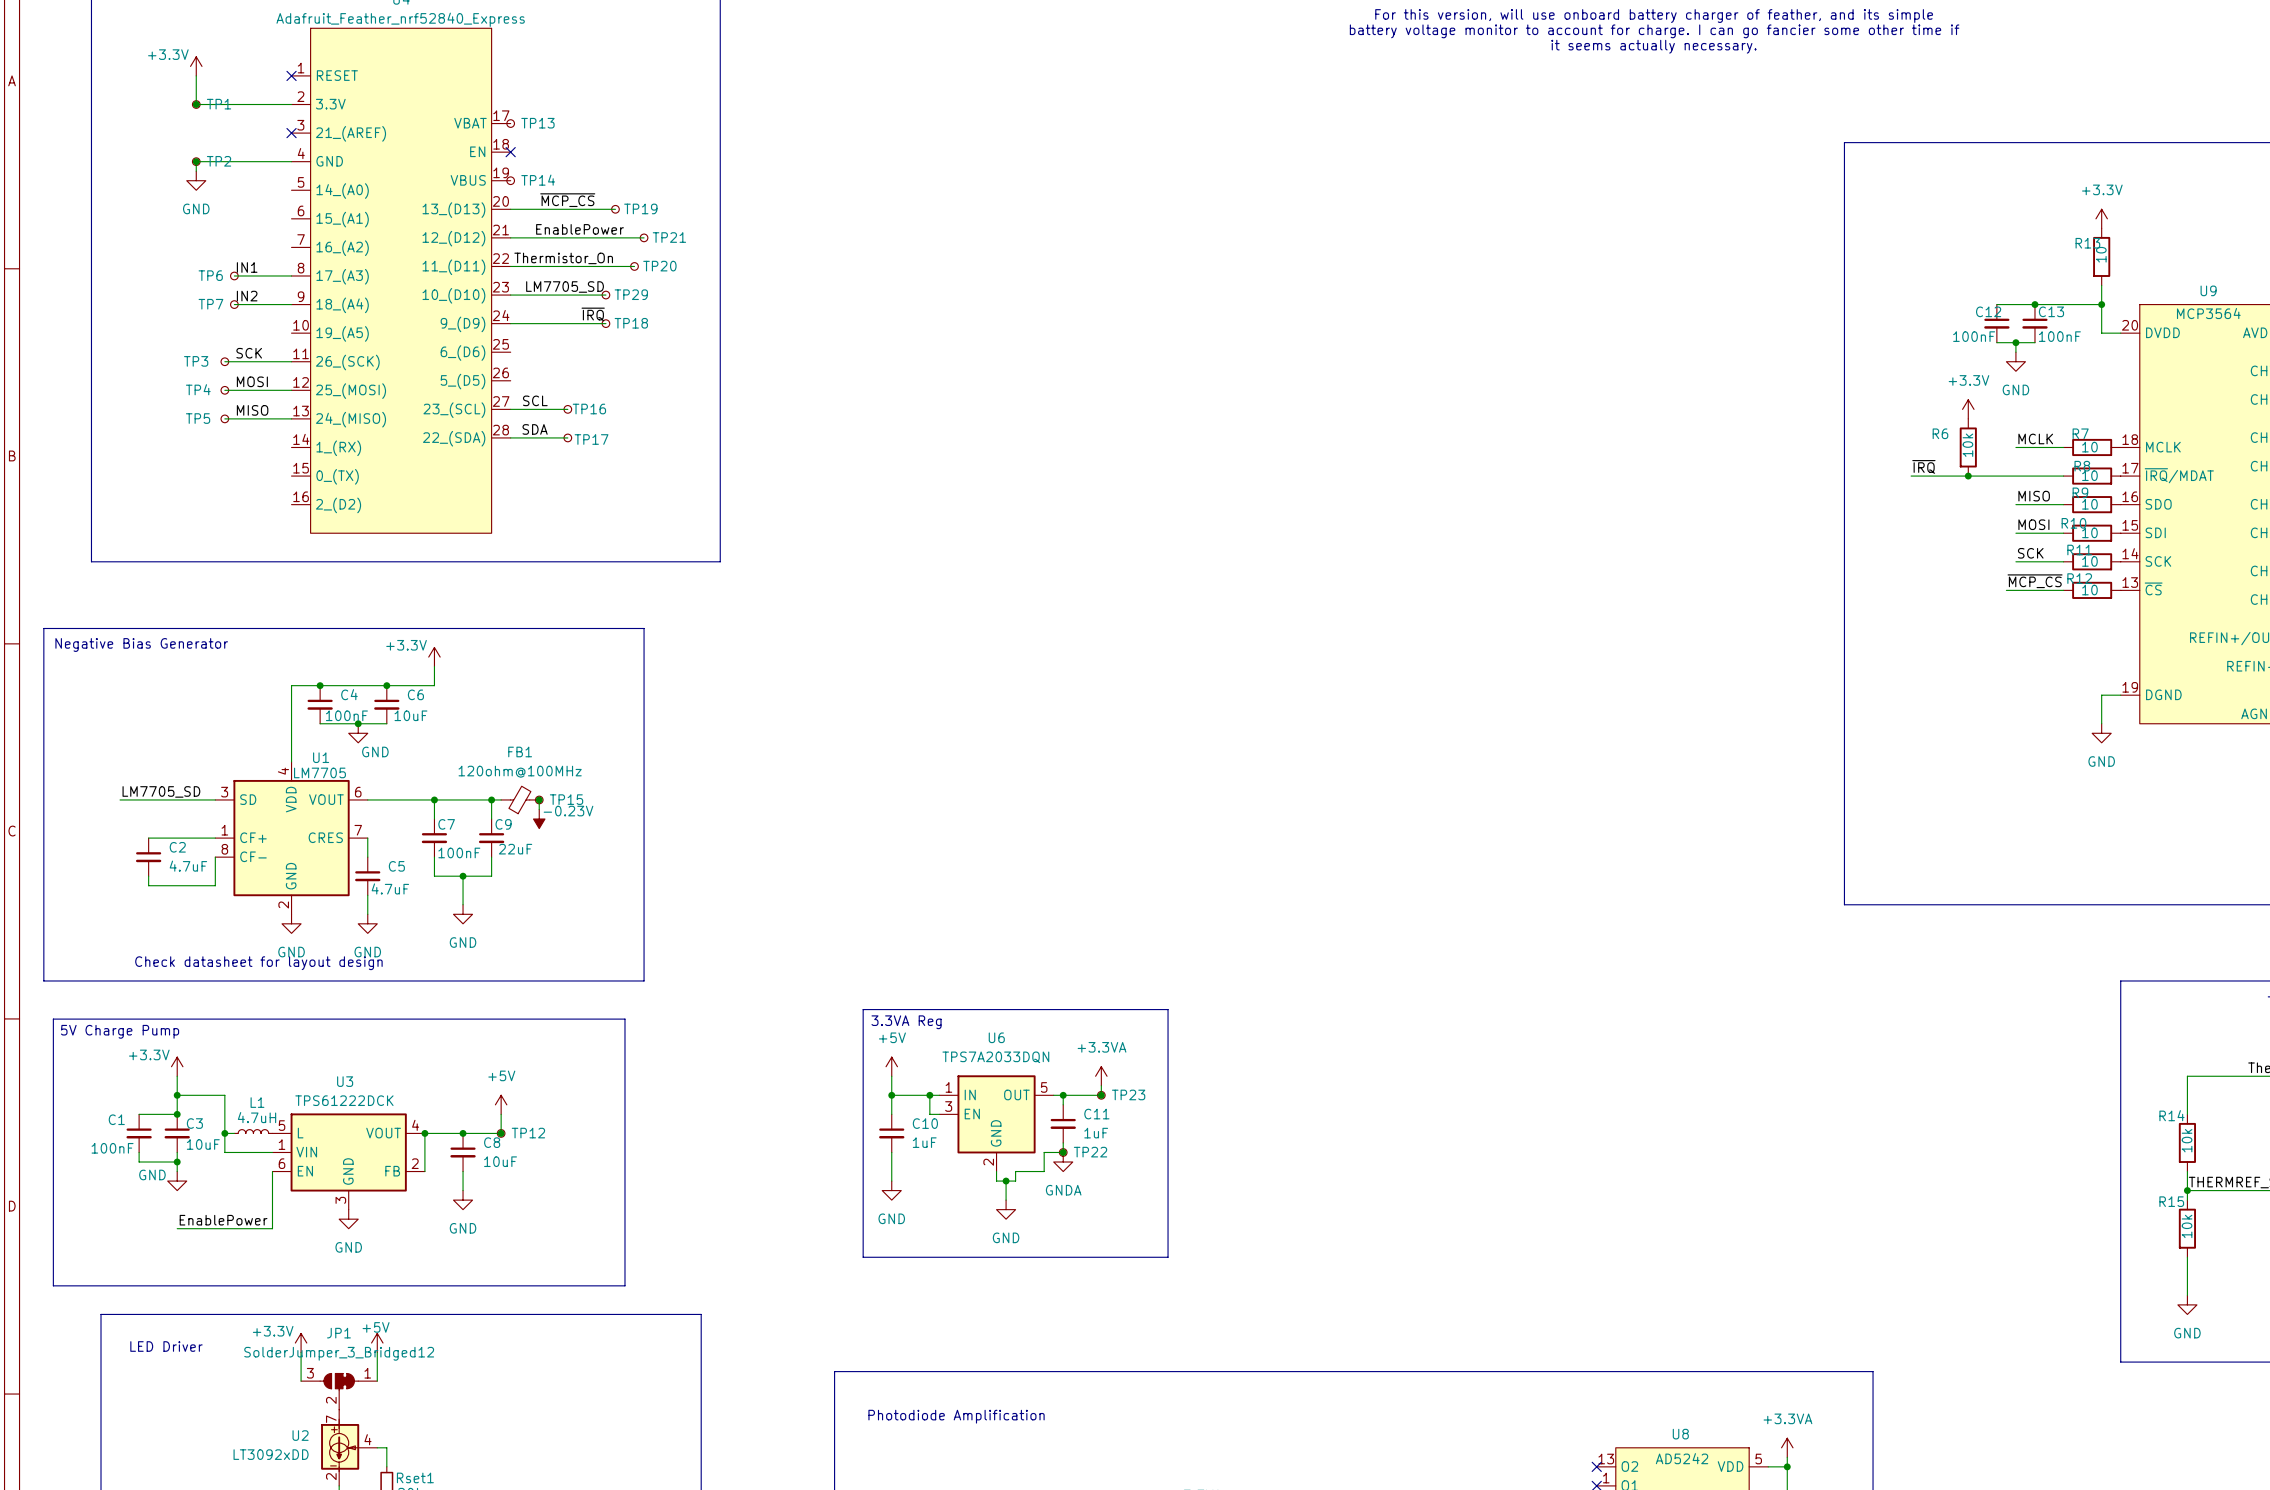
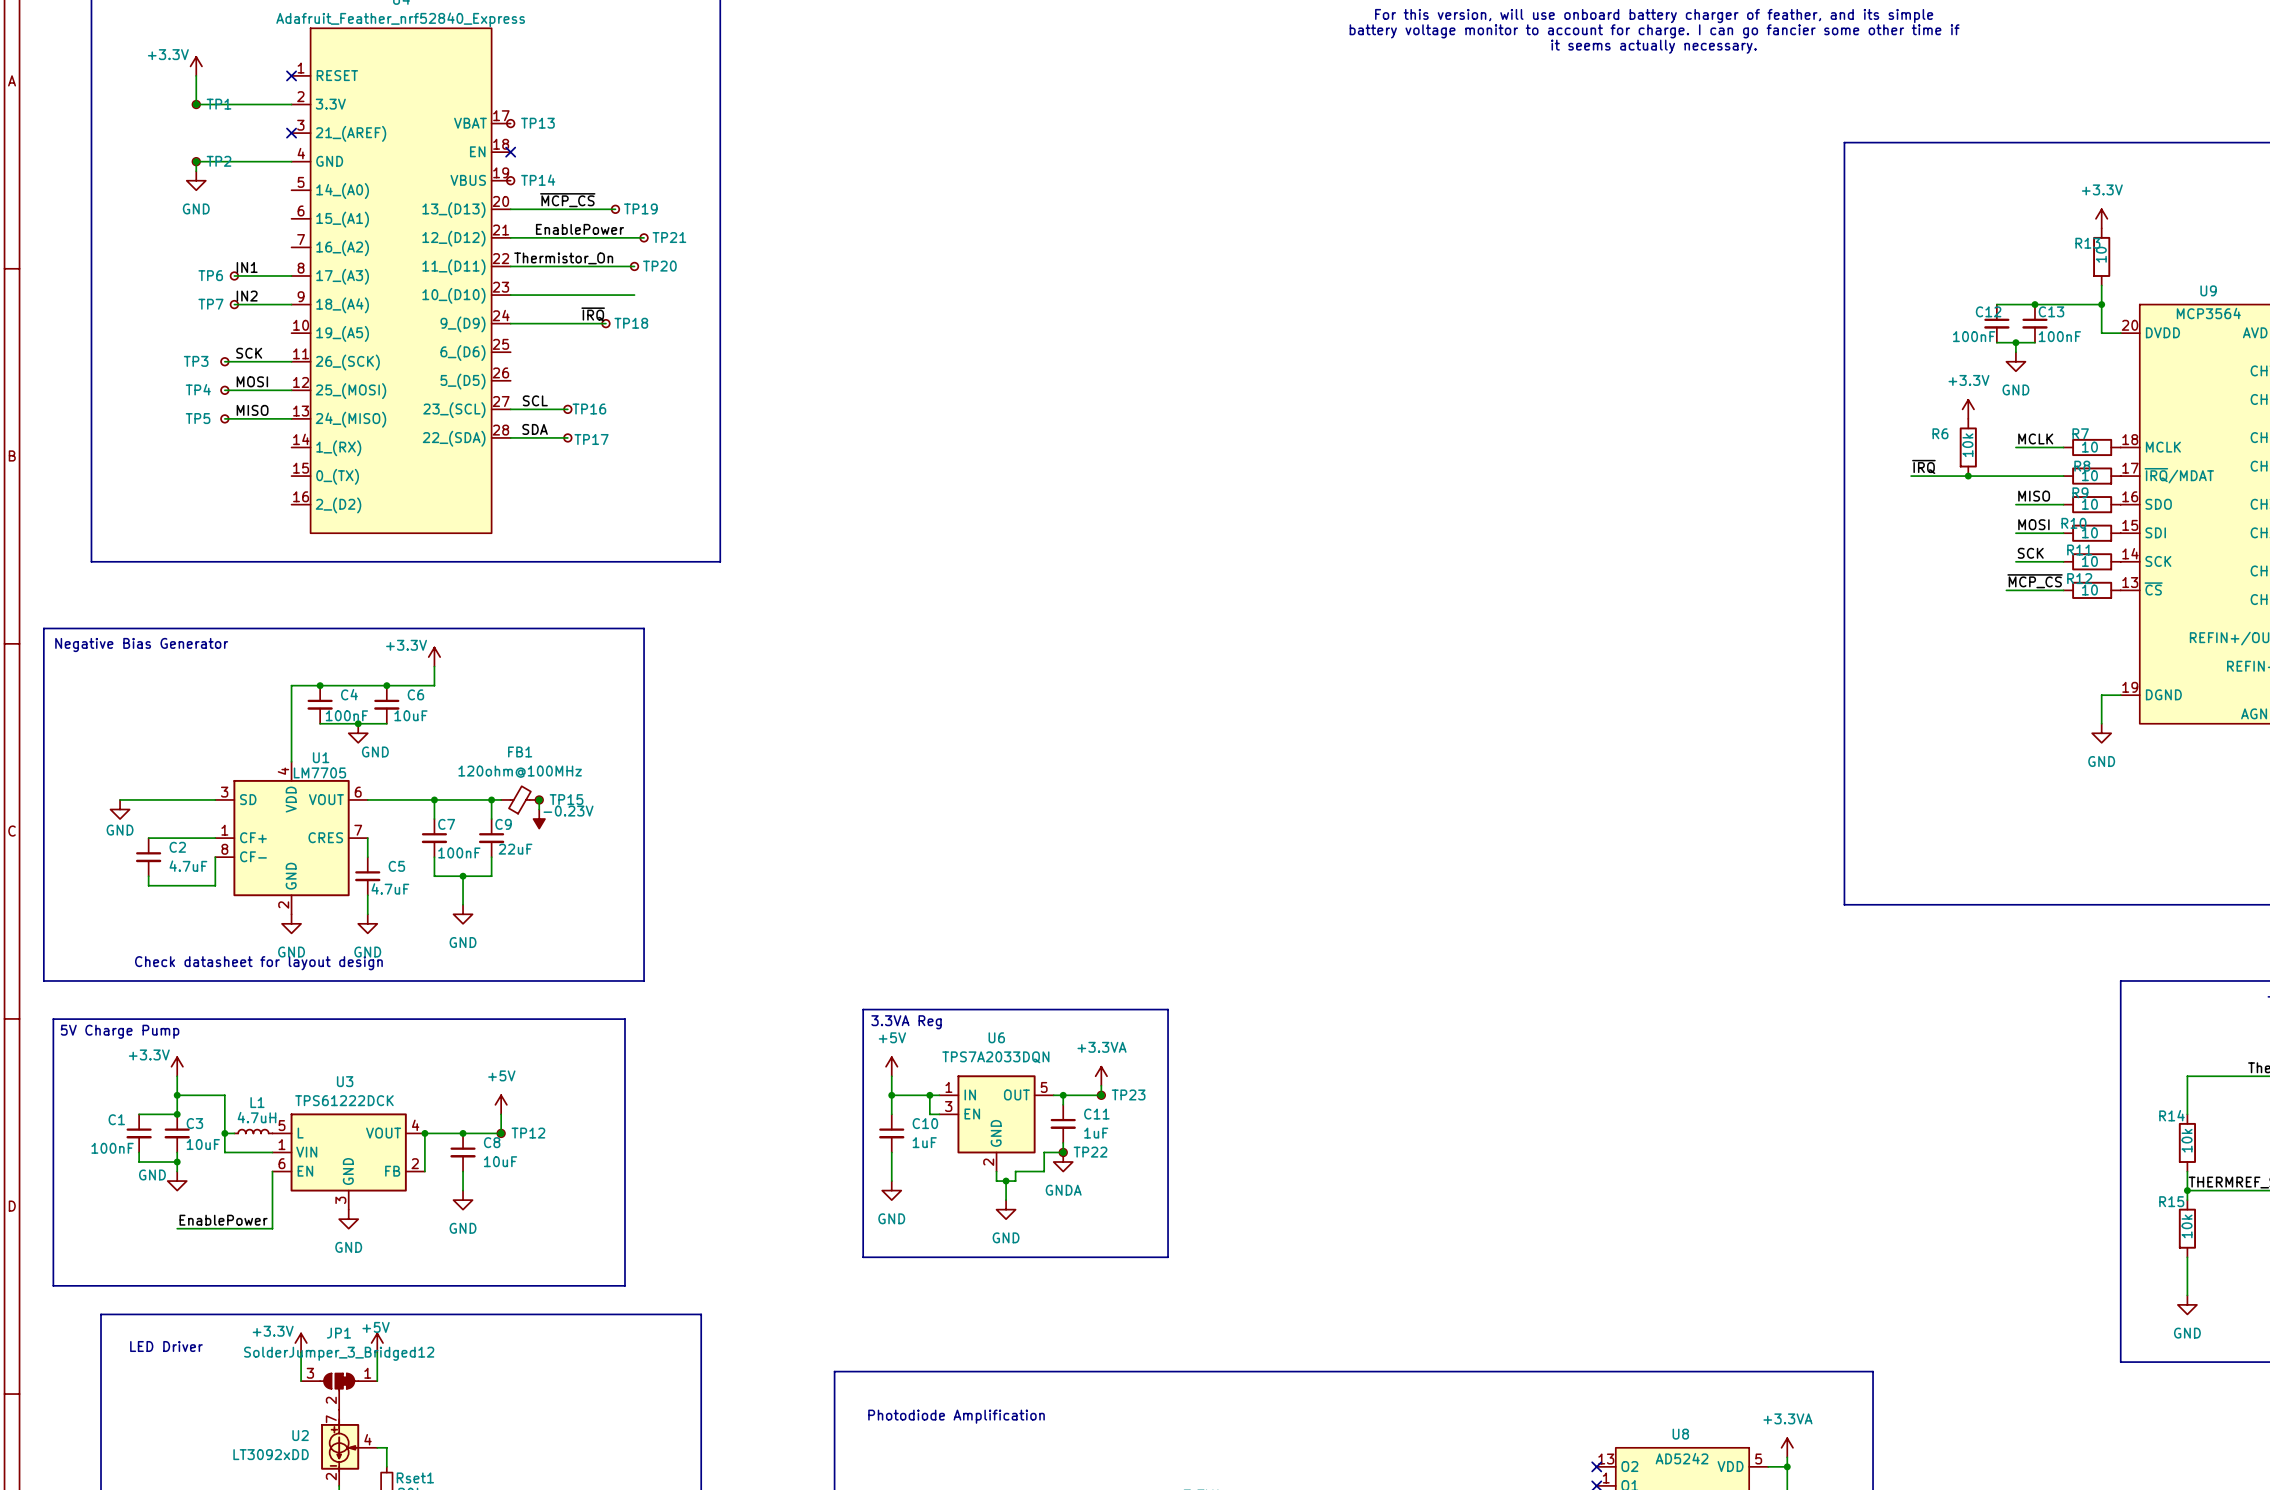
label: LM7705_SD (565, 287) -> none
wire: none -> (605, 295) (634, 295)
TP29: (605, 295) -> none
label: LM7705_SD (161, 791) -> none
power symbol: none -> GND (120, 809)

